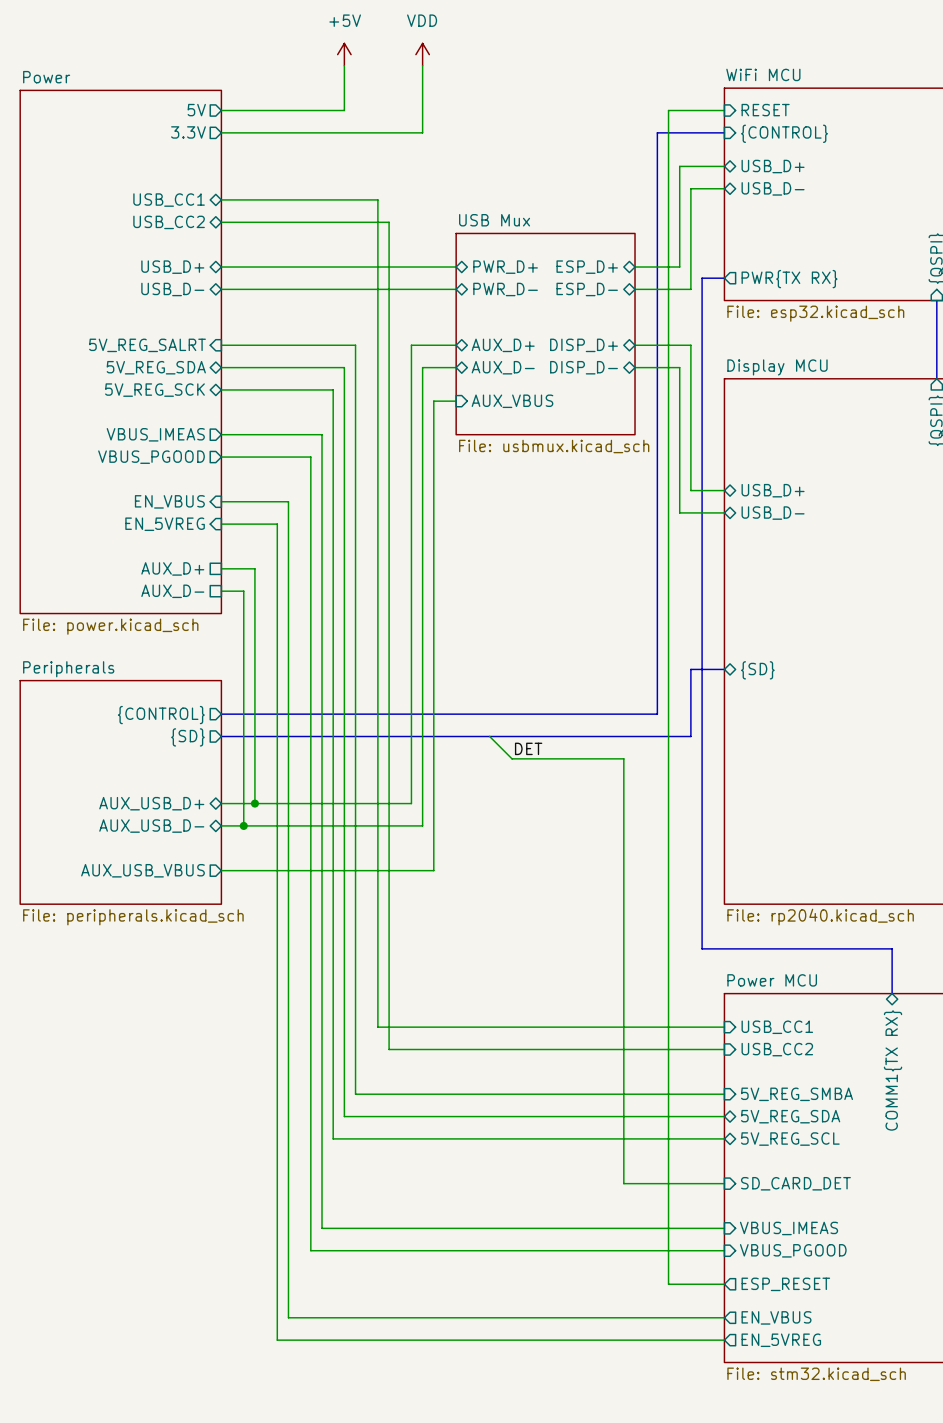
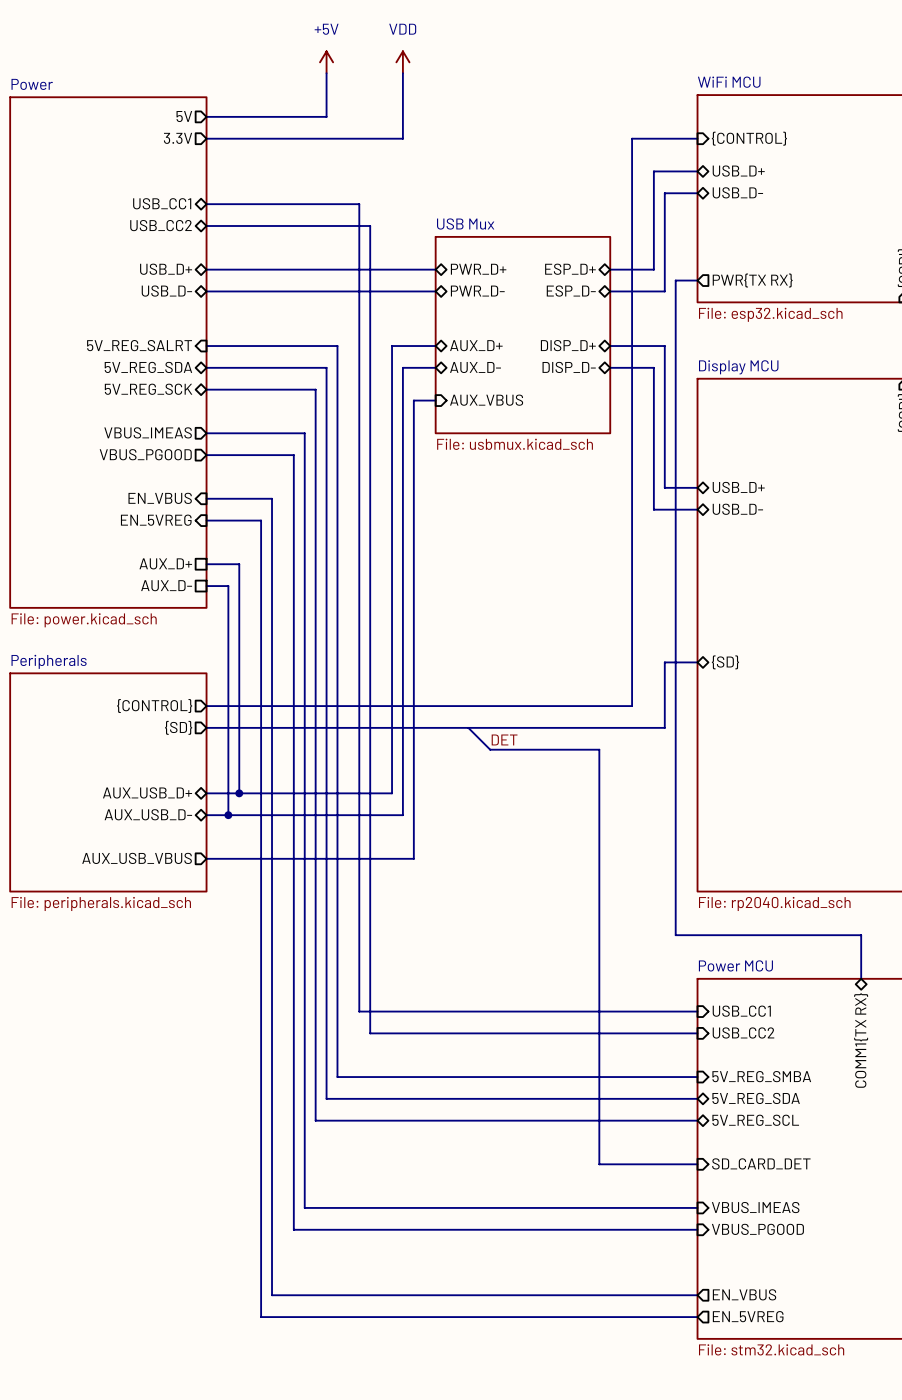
wire: (724, 110) (668, 110) (668, 1284) (724, 1284) -> none
sheet pin: RESET (765, 110) -> none
sheet pin: ESP_RESET (785, 1284) -> none

